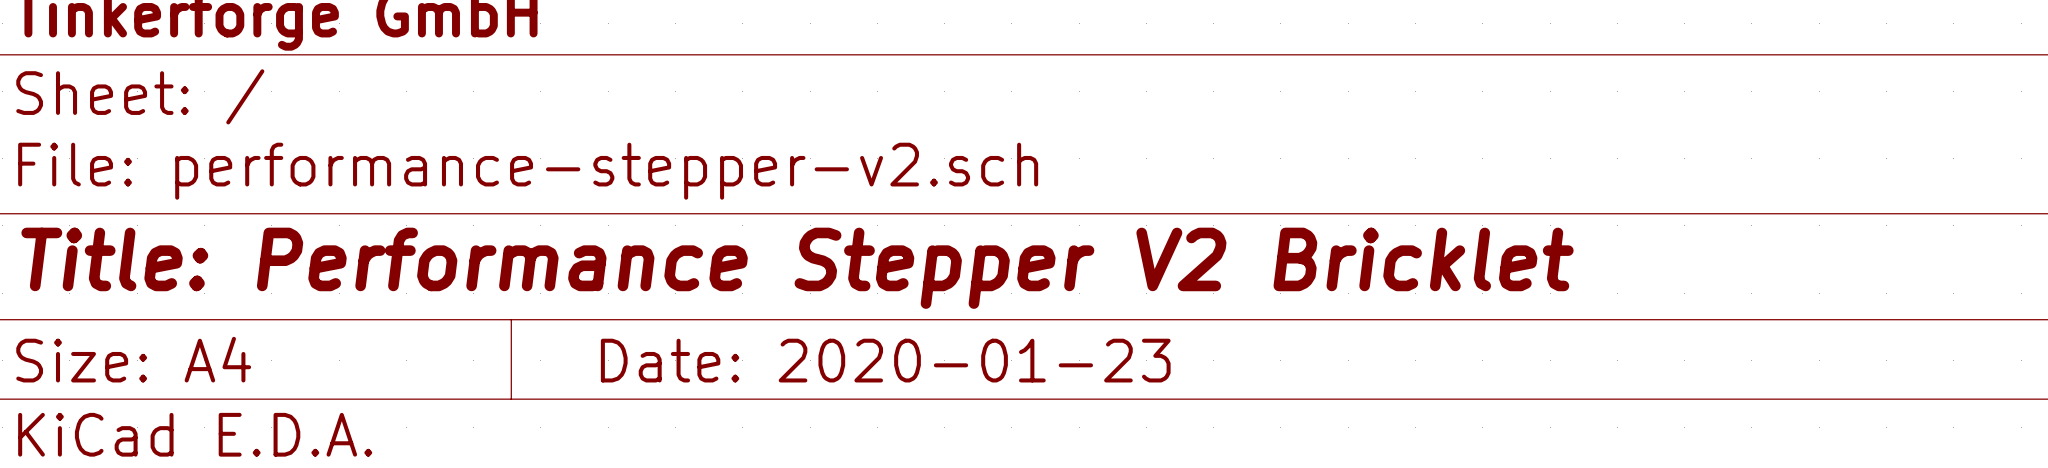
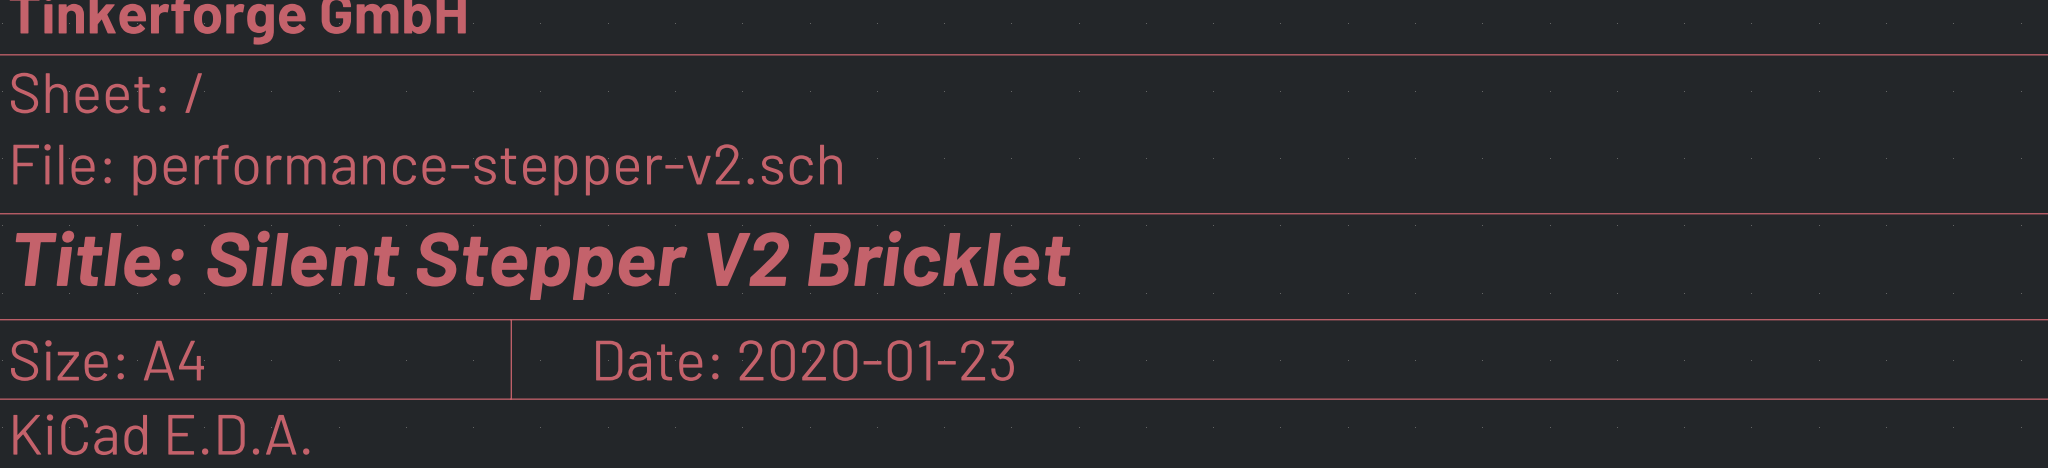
title block: Title: Performance Stepper V2 Bricklet (797, 268) -> Title: Silent Stepper V2 Bricklet (543, 265)

